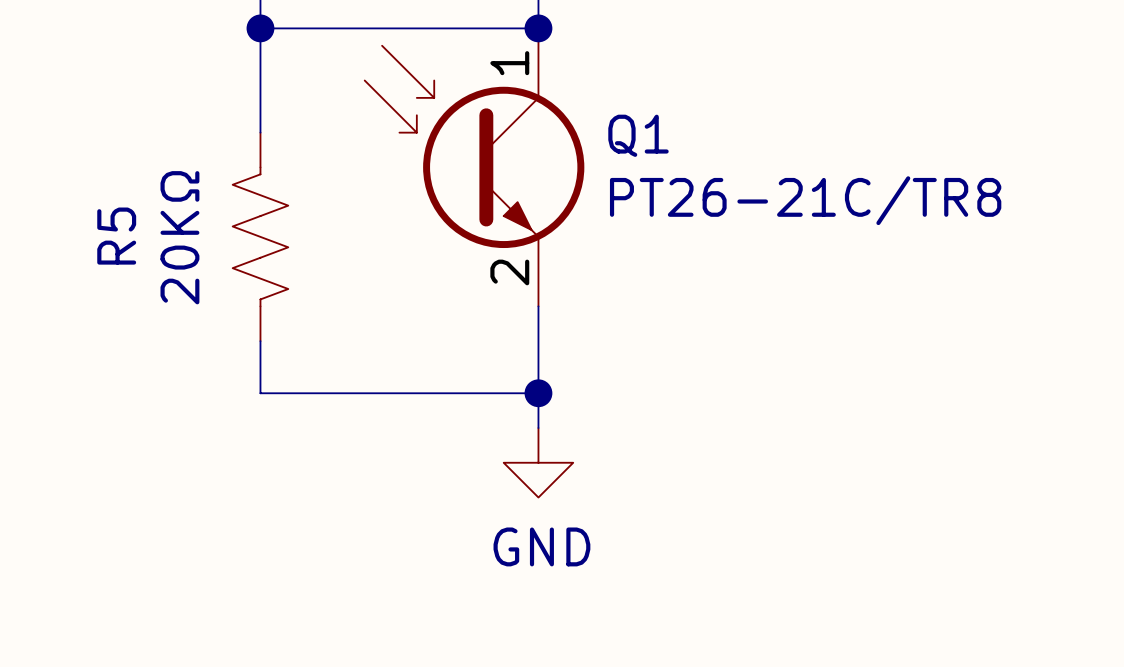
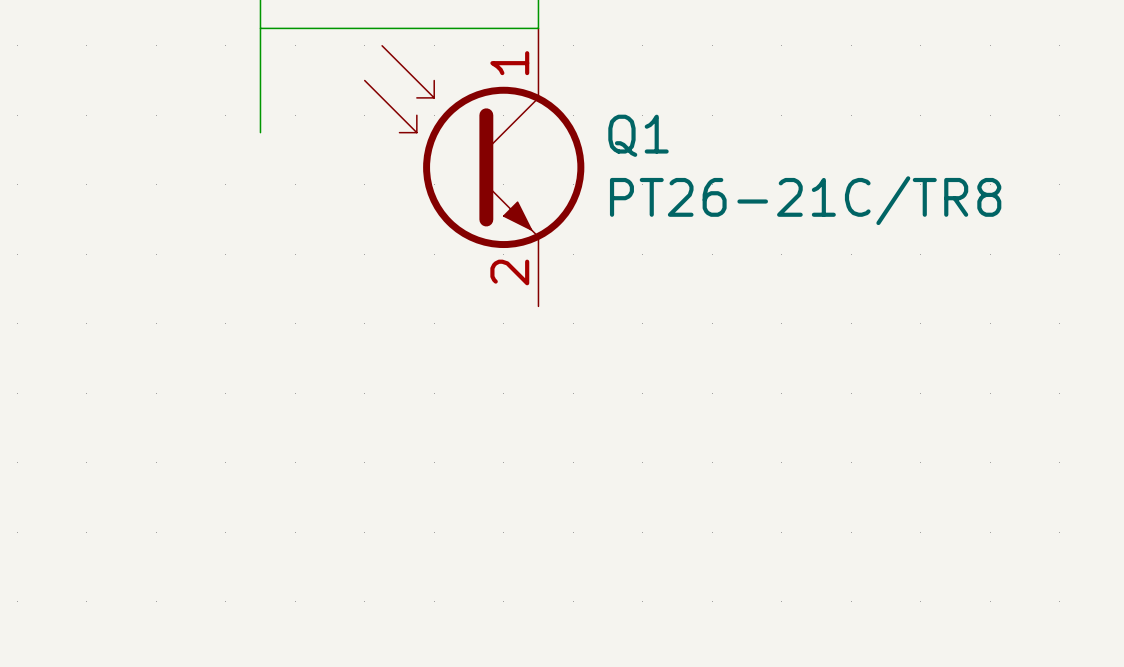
junction: (260, 28) -> none
junction: (538, 28) -> none
R5: 20KΩ (260, 236) -> none
wire: (538, 306) (538, 428) -> none
wire: (260, 341) (260, 393) (538, 393) -> none
junction: (538, 393) -> none
power symbol: GND (538, 462) -> none

